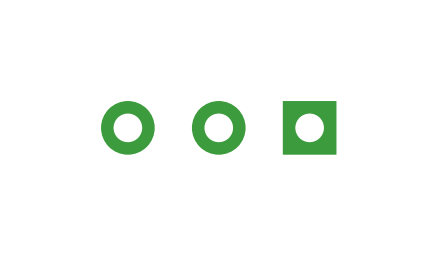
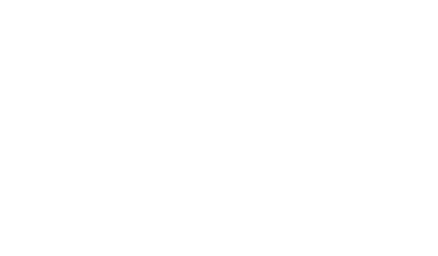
part: (218, 127) -> none

